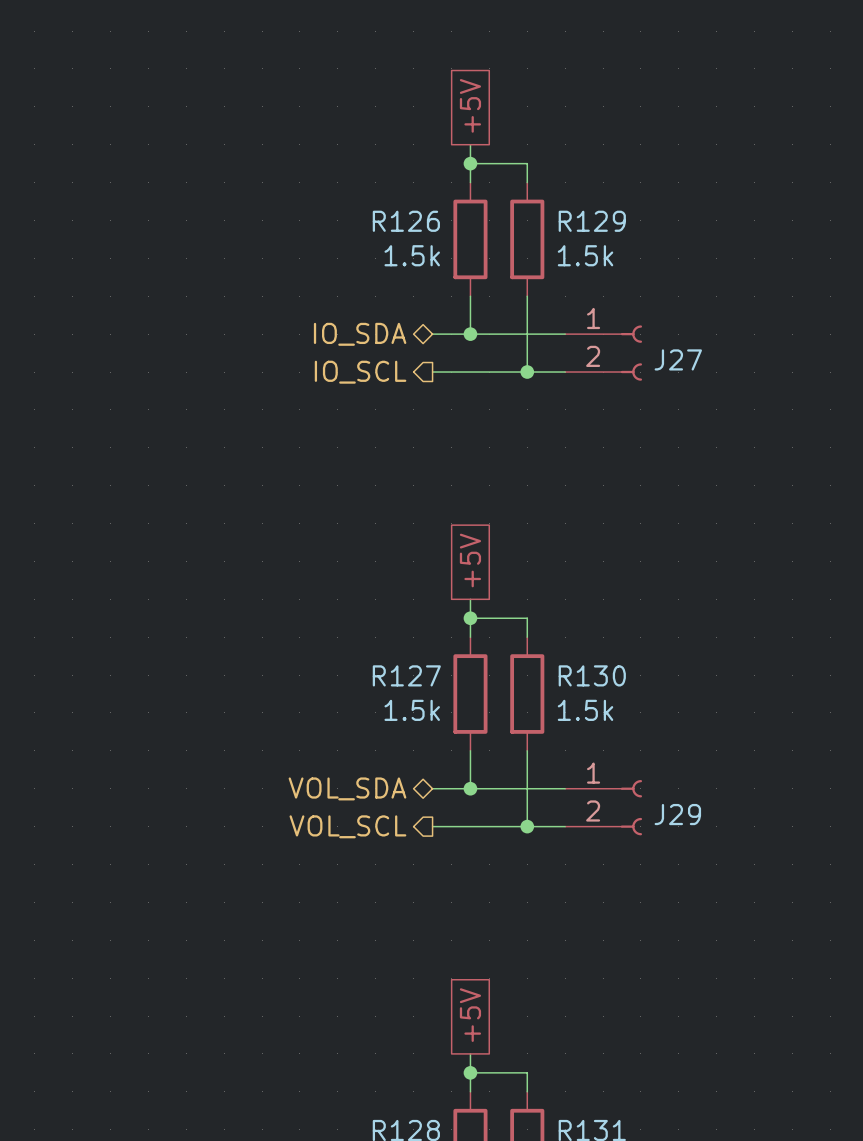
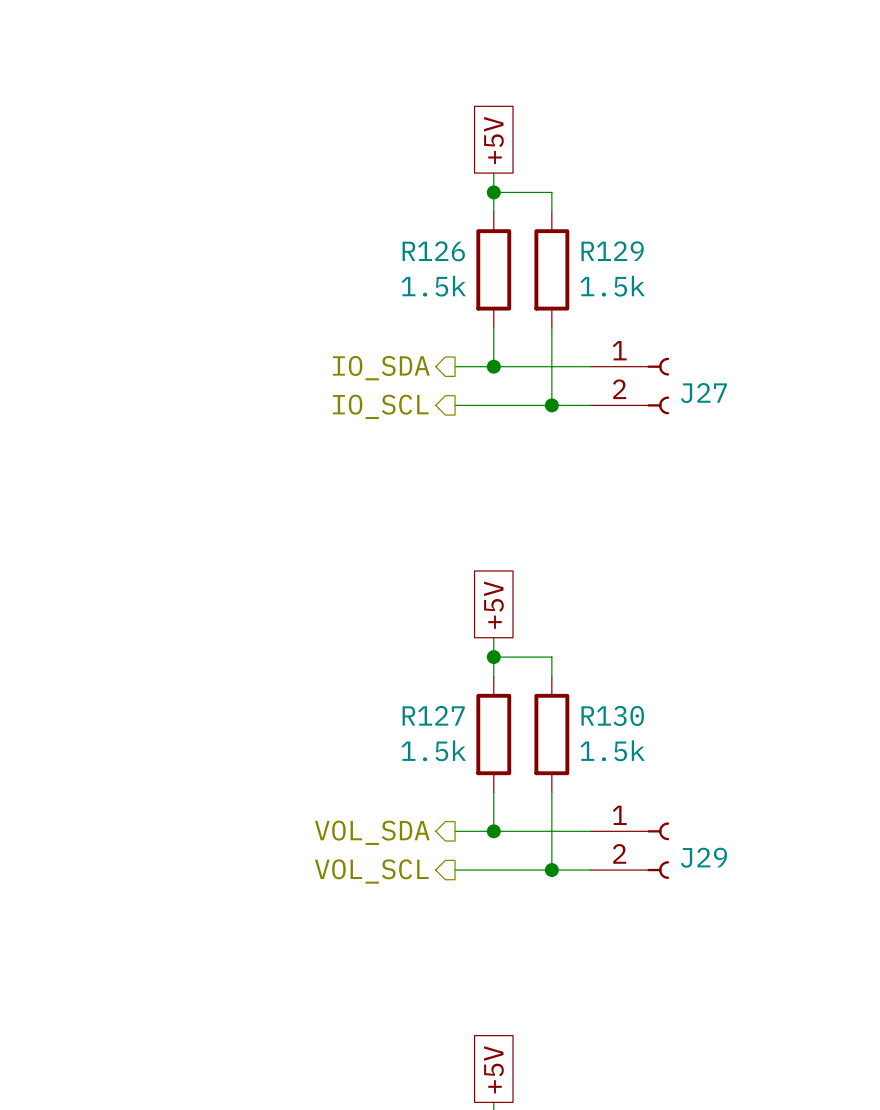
hierarchical label shape: bidirectional (360, 334) -> output (381, 368)
hierarchical label shape: bidirectional (347, 788) -> output (372, 832)

